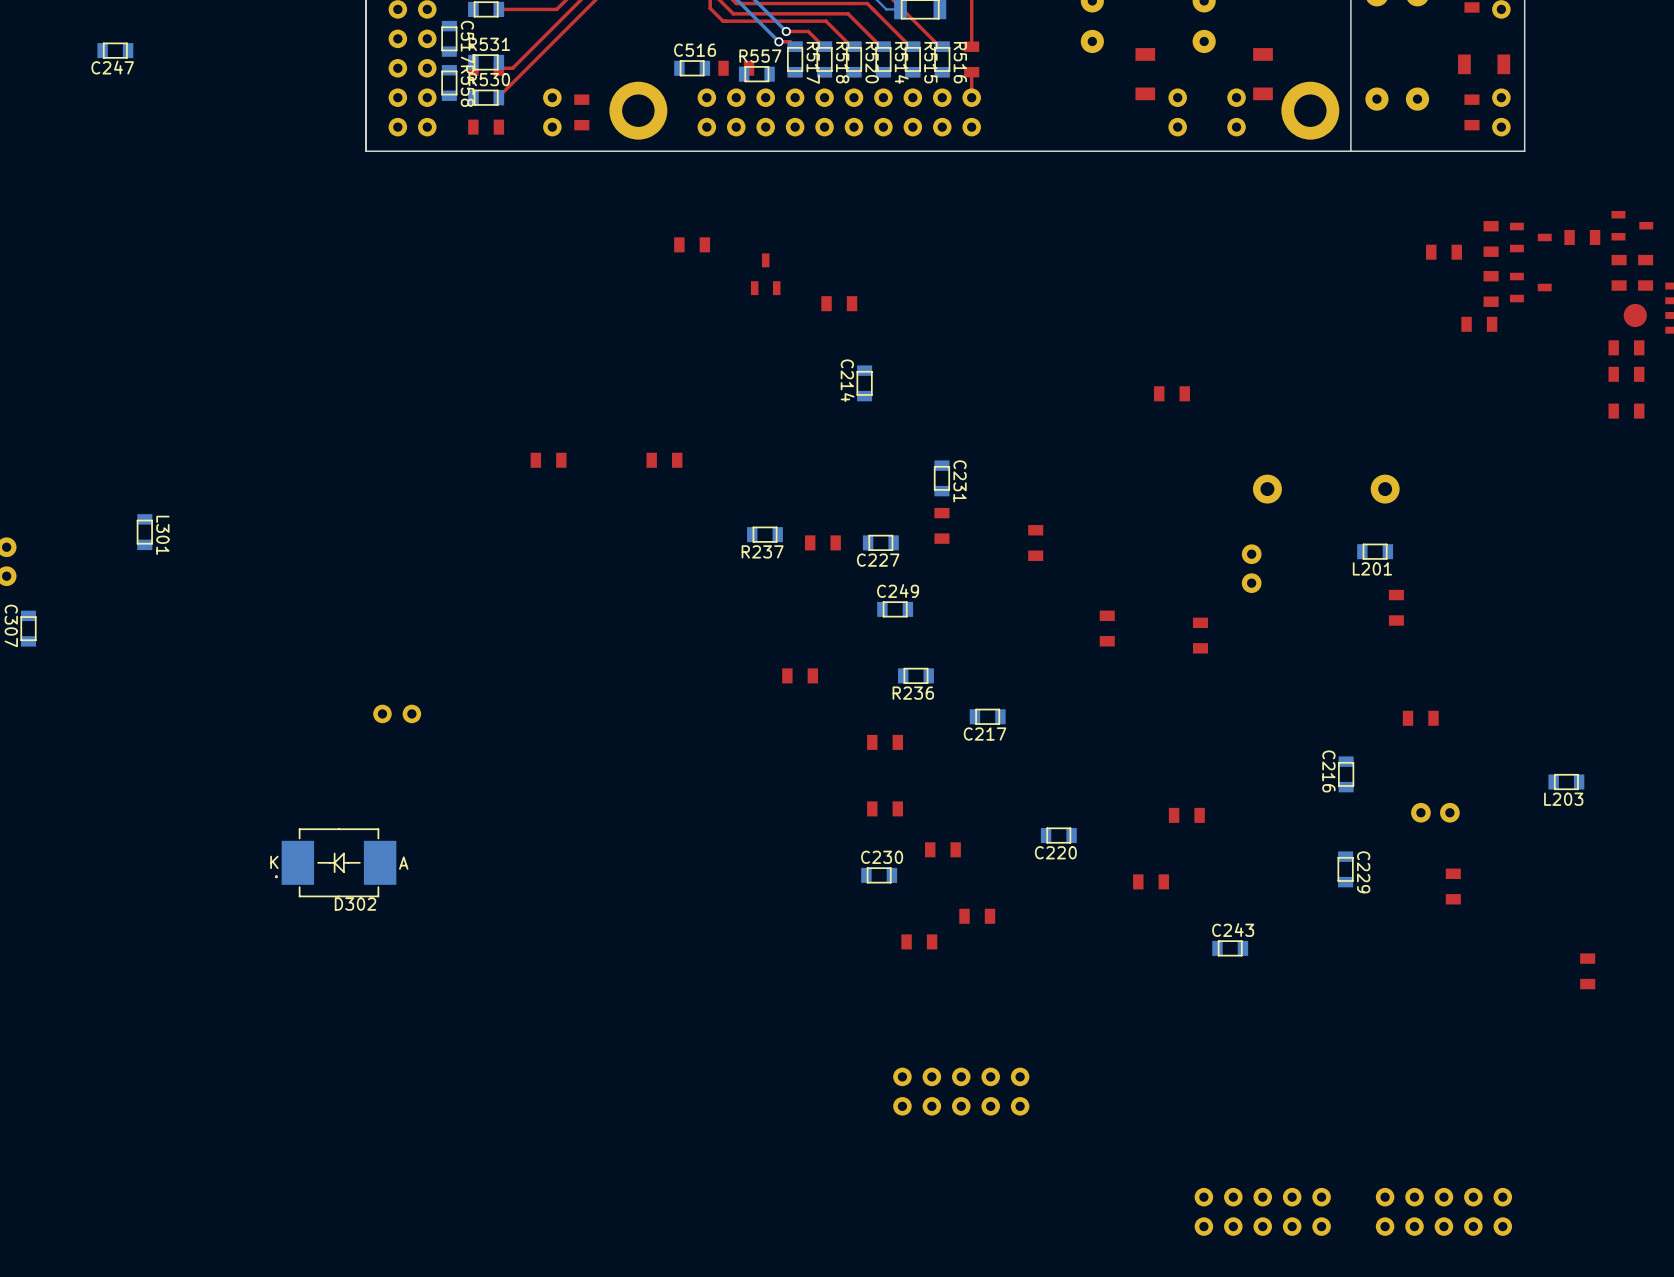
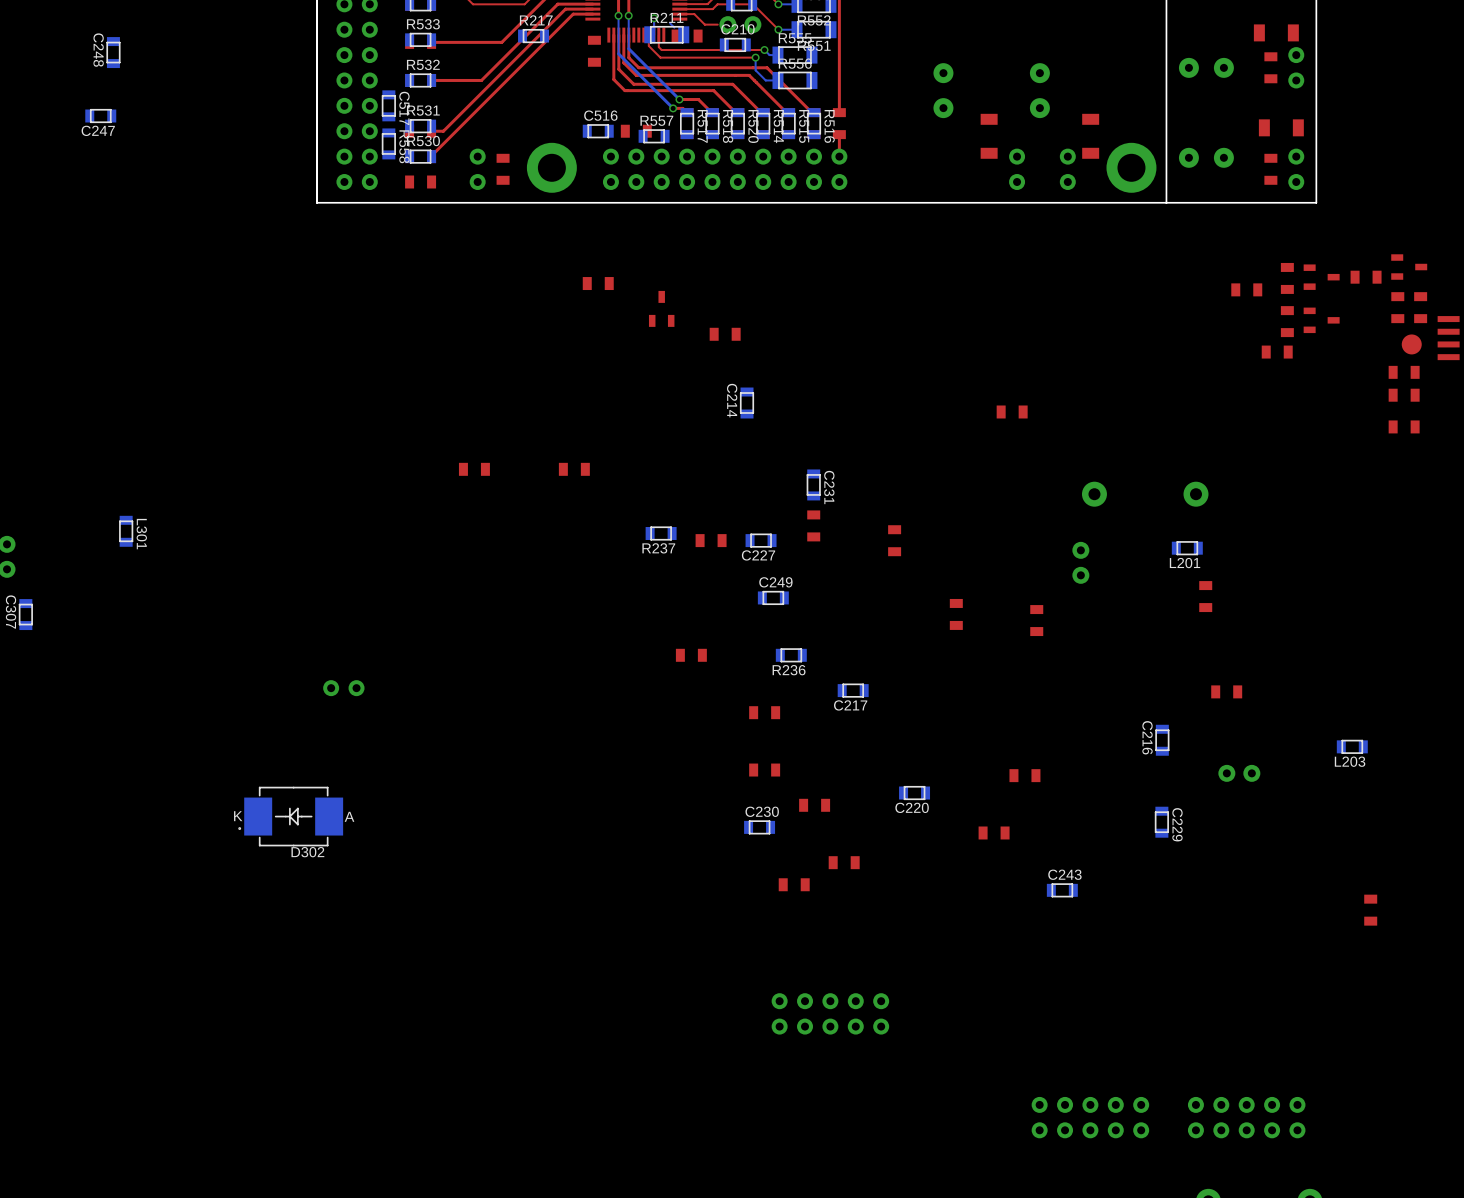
part: (1453, 886) -> none

